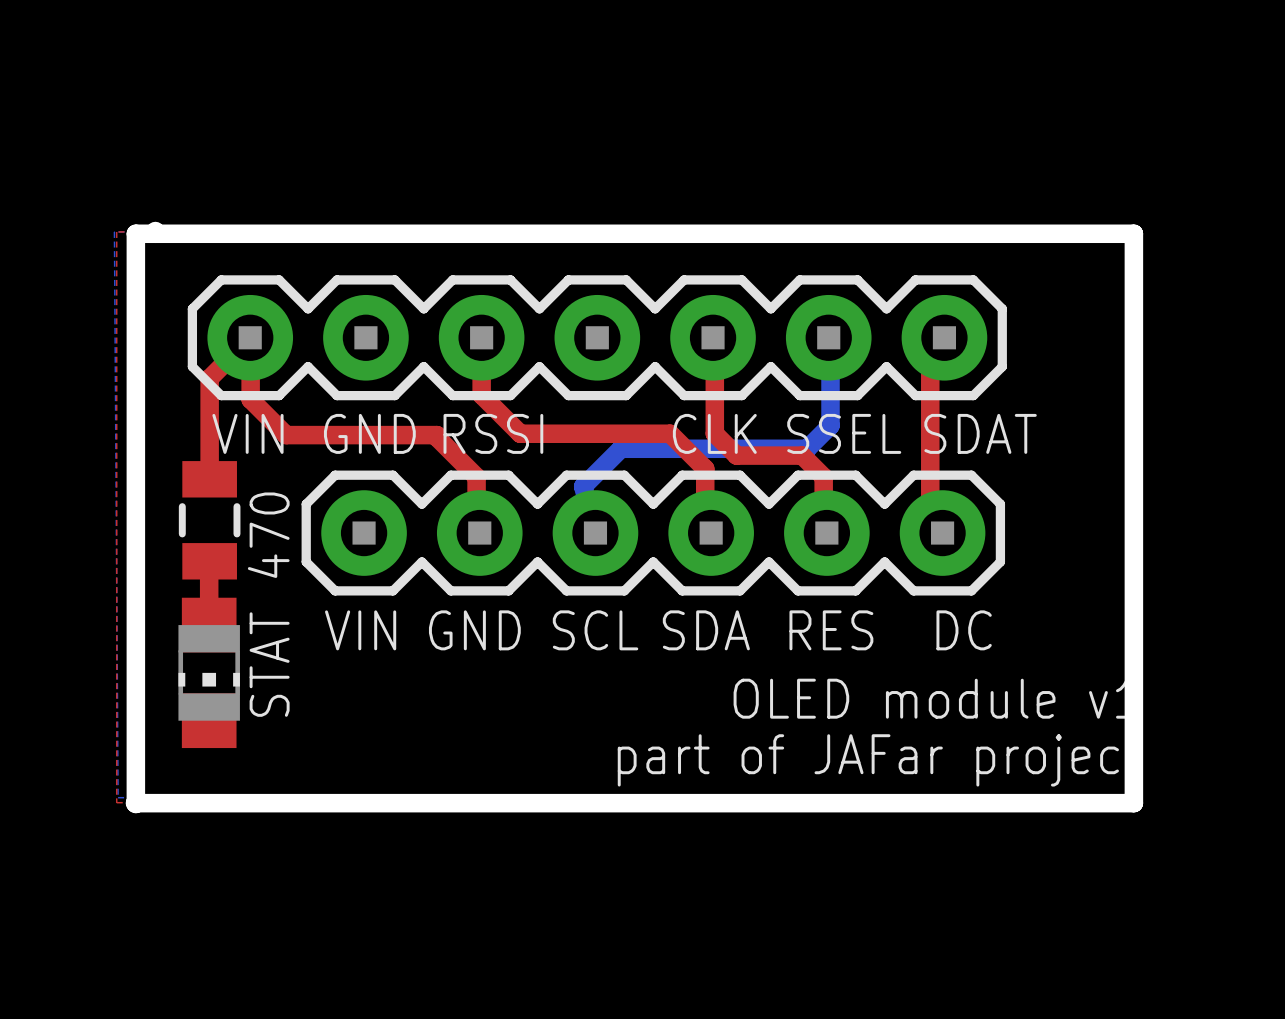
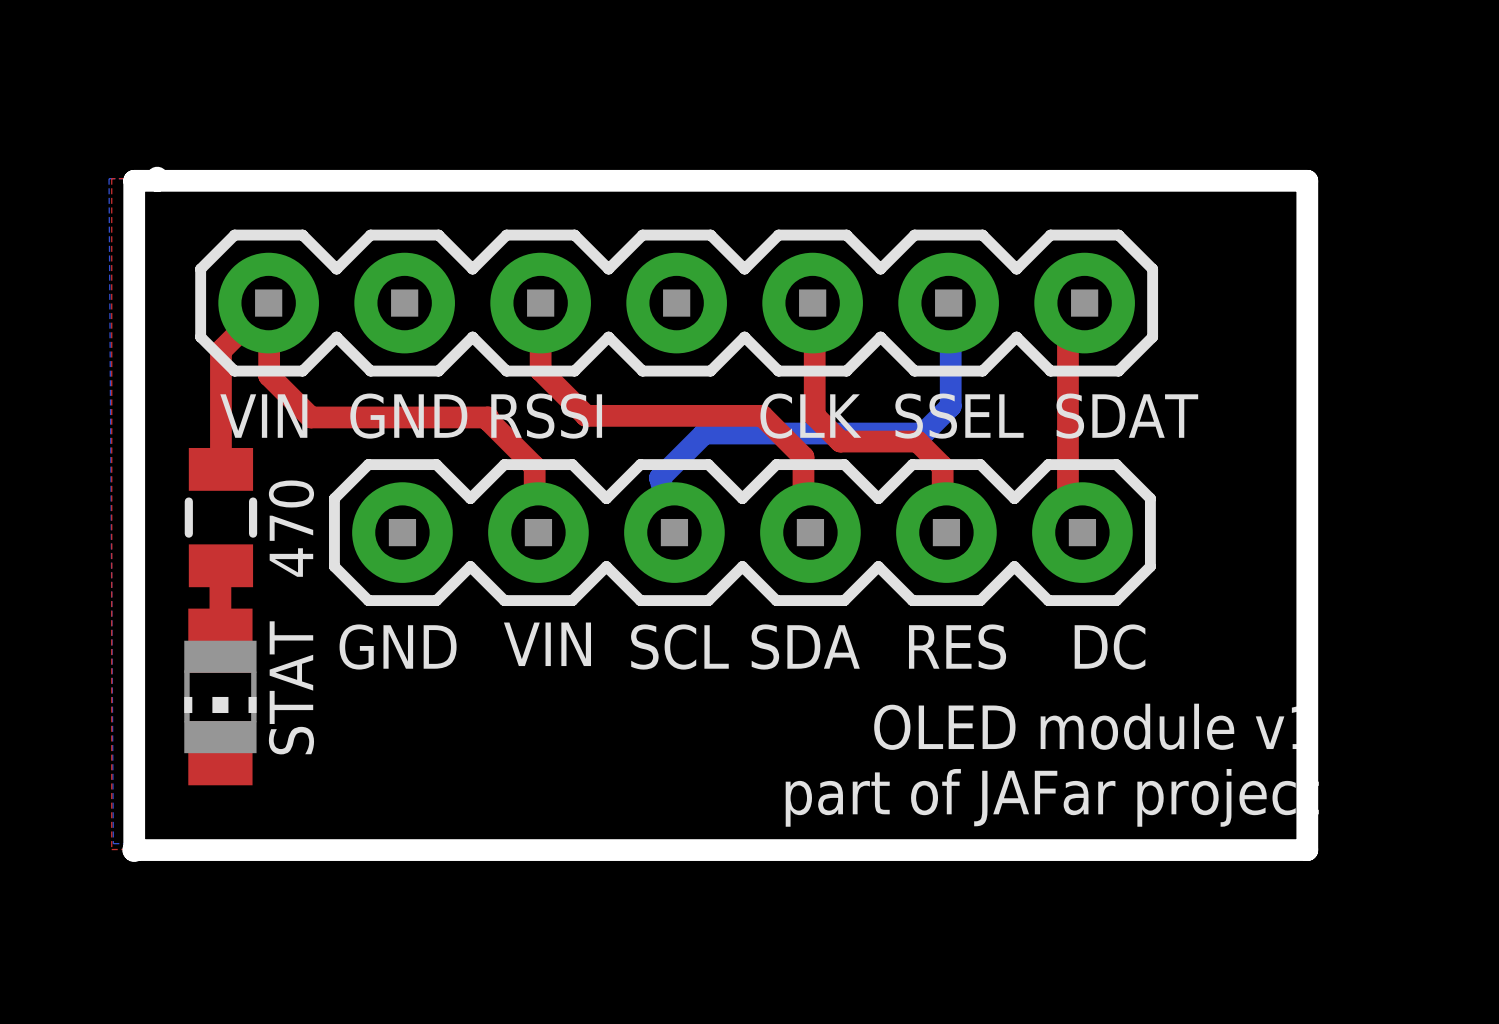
text: VIN (360, 630) -> GND (398, 647)
text: GND (474, 630) -> VIN (547, 644)

